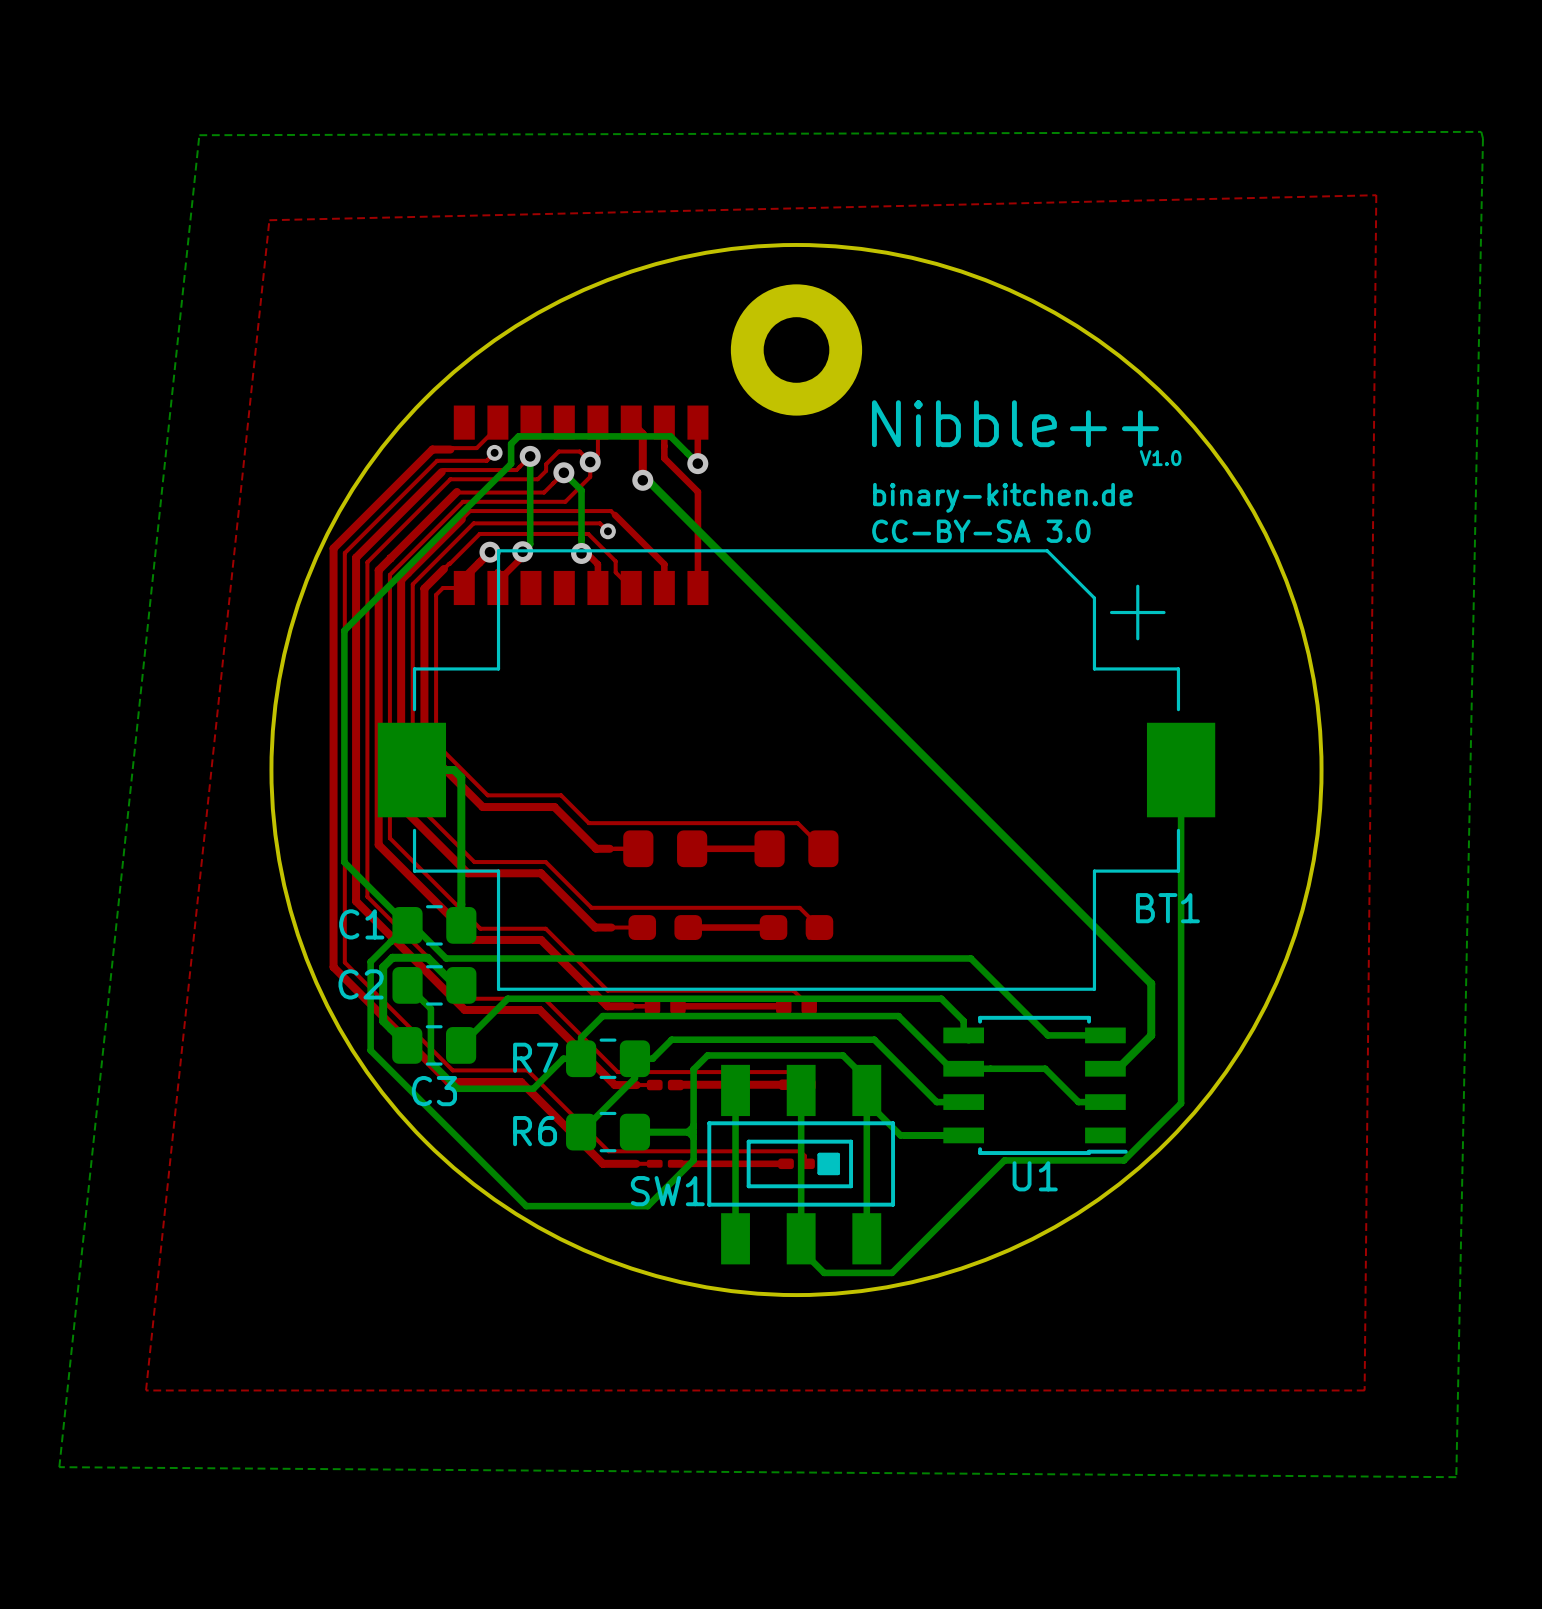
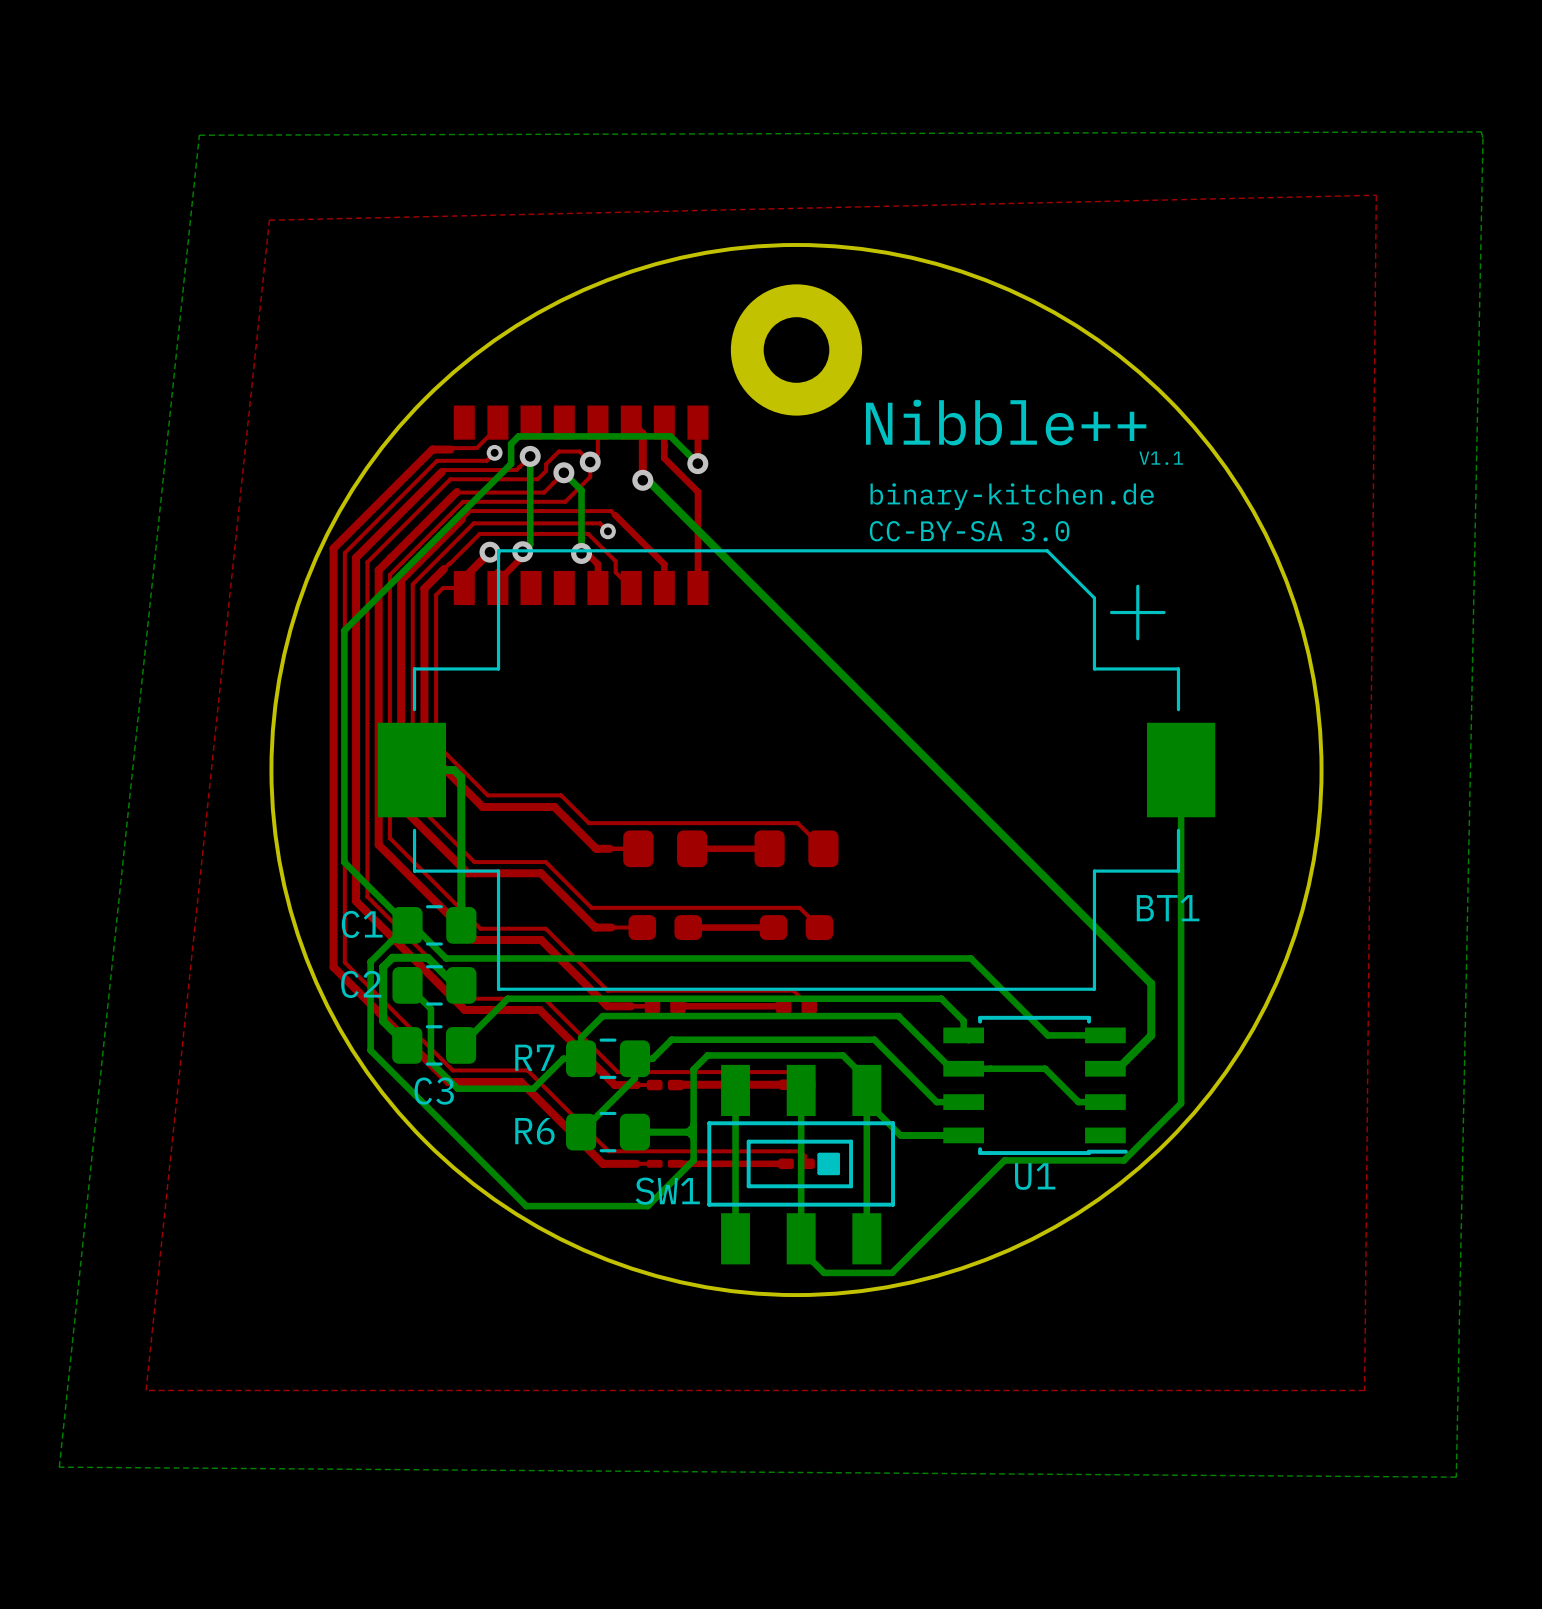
text: V1.0 (1160, 458) -> V1.1 (1161, 458)

